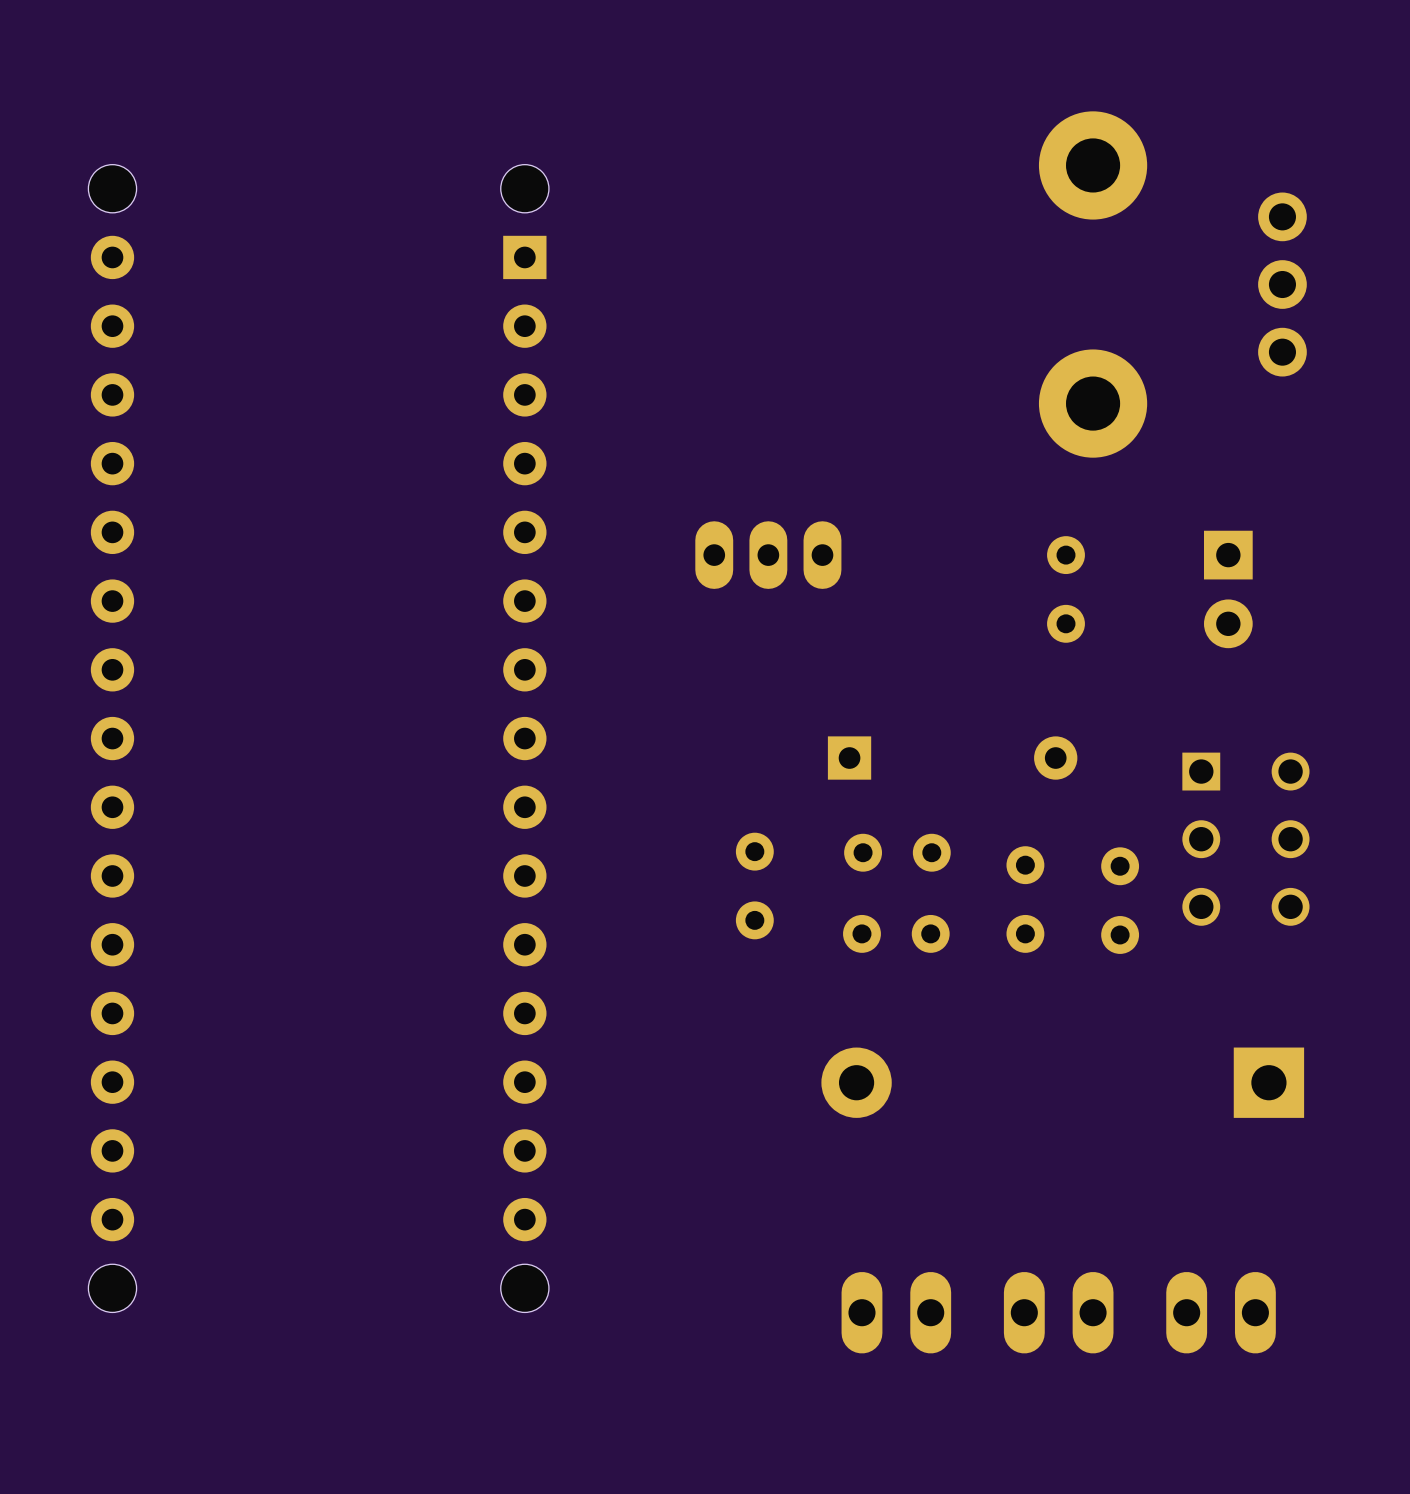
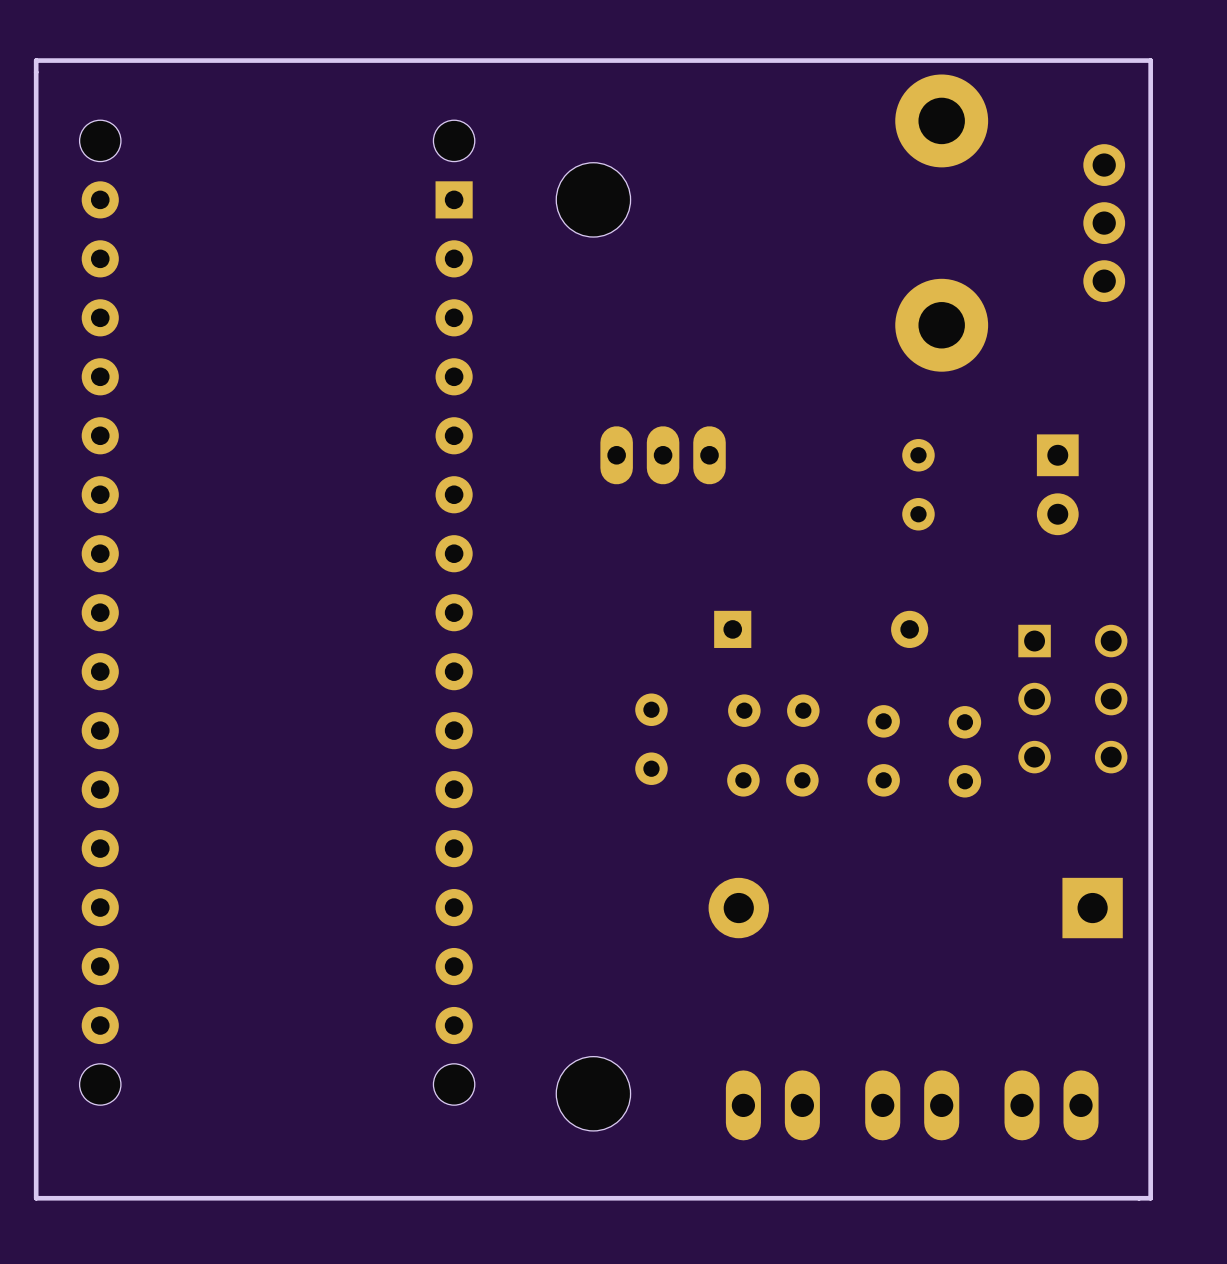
board edge: none -> (1150, 60) (1150, 1198) (36, 1198) (36, 60) (1150, 60)
part: none -> (593, 199)
part: none -> (593, 1093)

